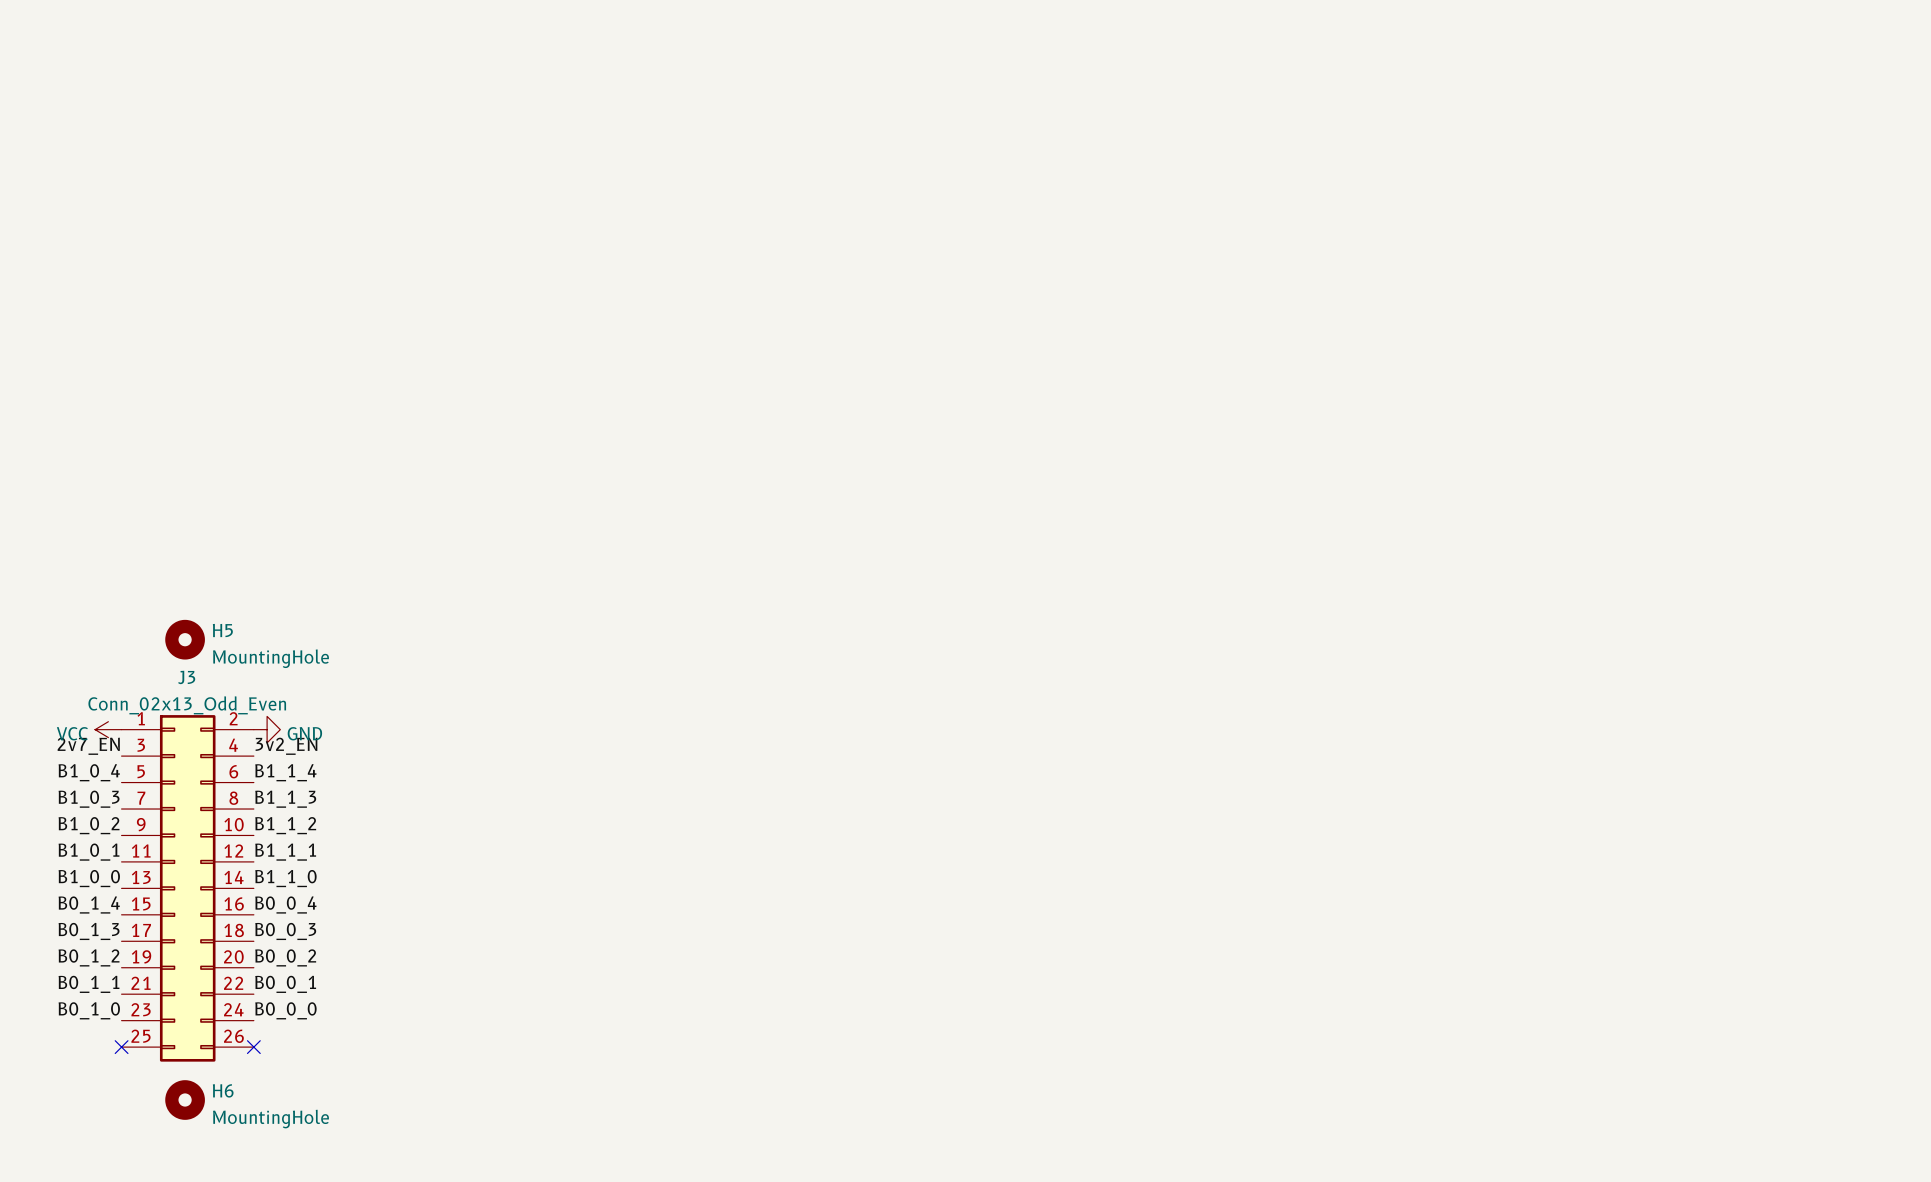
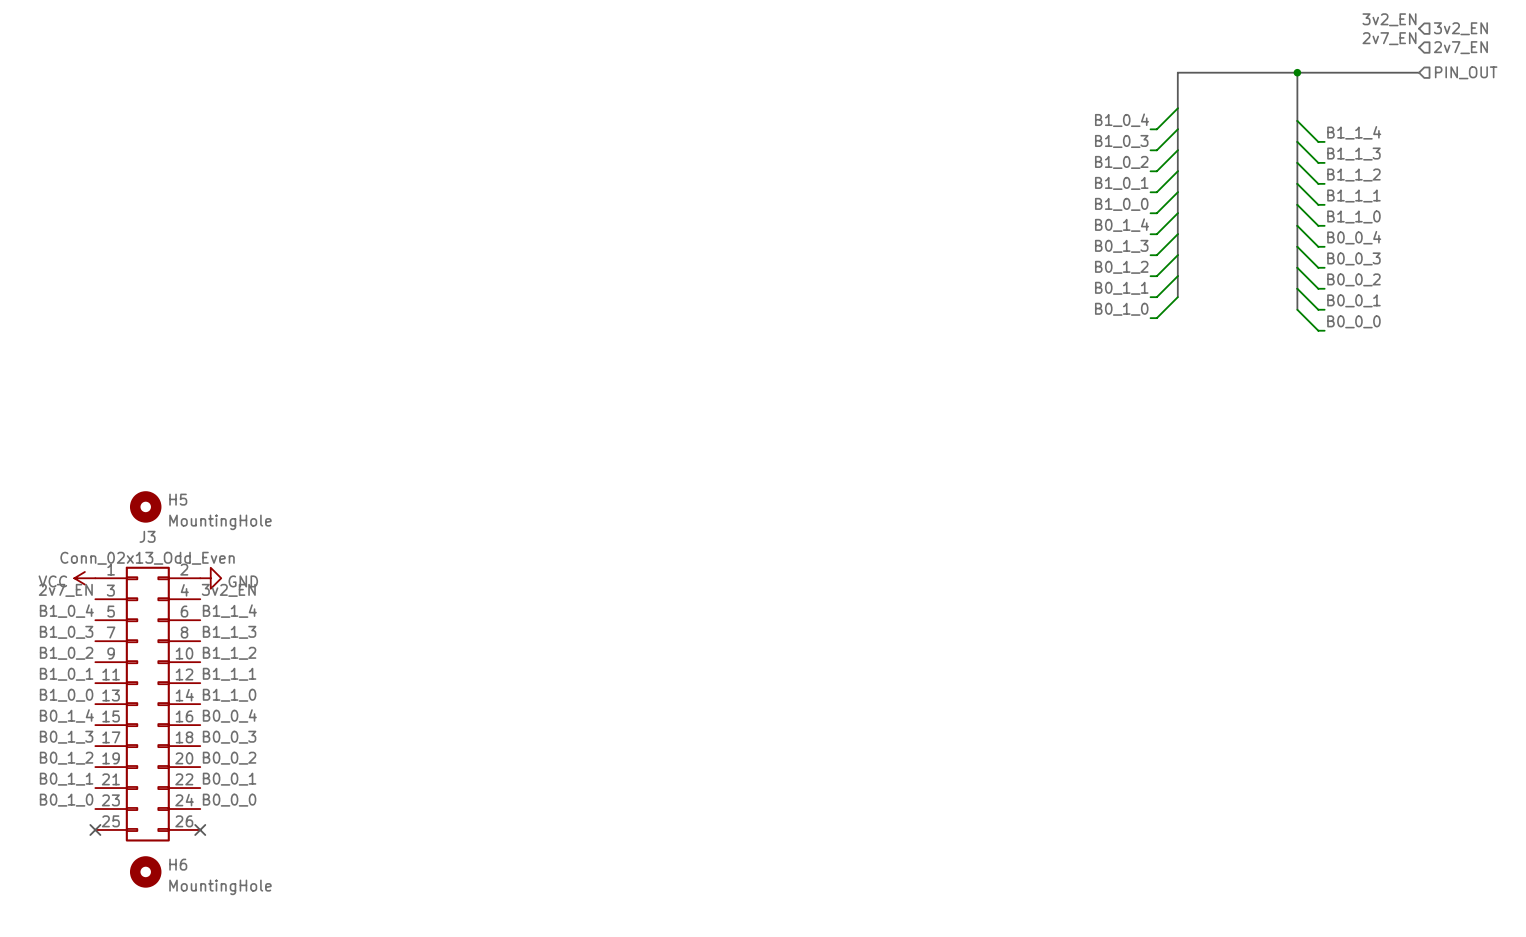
label: none -> 3v2_EN (1389, 19)
hierarchical label: none -> 3v2_EN (1460, 28)
label: none -> 2v7_EN (1389, 38)
hierarchical label: none -> 2v7_EN (1460, 47)
bus: none -> (1297, 72) (1297, 309)
junction: none -> (1297, 72)
bus: none -> (1419, 72) (1177, 72) (1177, 297)
hierarchical label: none -> PIN_OUT (1466, 72)
wire: none -> (1177, 108) (1156, 129) (1150, 129)
wire: none -> (1297, 120) (1318, 141) (1324, 141)
label: none -> B1_0_4 (1121, 120)
wire: none -> (1177, 129) (1156, 150) (1150, 150)
label: none -> B1_1_4 (1354, 132)
wire: none -> (1297, 141) (1318, 162) (1324, 162)
label: none -> B1_0_3 (1121, 141)
wire: none -> (1177, 150) (1156, 171) (1150, 171)
label: none -> B1_1_3 (1353, 154)
wire: none -> (1297, 162) (1318, 183) (1324, 183)
label: none -> B1_0_2 (1121, 162)
wire: none -> (1177, 171) (1156, 192) (1150, 192)
label: none -> B1_1_2 (1353, 175)
wire: none -> (1297, 183) (1318, 204) (1324, 204)
label: none -> B1_0_1 (1121, 183)
wire: none -> (1177, 192) (1156, 213) (1150, 213)
label: none -> B1_1_1 (1353, 196)
wire: none -> (1297, 204) (1318, 225) (1324, 225)
label: none -> B1_0_0 (1121, 204)
wire: none -> (1177, 213) (1156, 234) (1150, 234)
label: none -> B1_1_0 (1353, 216)
label: none -> B0_1_4 (1121, 225)
wire: none -> (1297, 225) (1318, 246) (1324, 246)
wire: none -> (1177, 234) (1156, 255) (1150, 255)
label: none -> B0_0_4 (1354, 237)
wire: none -> (1297, 246) (1318, 267) (1324, 267)
label: none -> B0_1_3 (1121, 246)
wire: none -> (1177, 255) (1156, 276) (1150, 276)
label: none -> B0_0_3 (1353, 258)
label: none -> B0_1_2 (1121, 267)
wire: none -> (1297, 267) (1318, 288) (1324, 288)
wire: none -> (1177, 276) (1156, 297) (1150, 297)
label: none -> B0_0_2 (1353, 279)
wire: none -> (1297, 288) (1318, 309) (1324, 309)
label: none -> B0_1_1 (1121, 288)
wire: none -> (1177, 297) (1156, 318) (1150, 318)
label: none -> B0_0_1 (1353, 300)
label: none -> B0_1_0 (1121, 309)
wire: none -> (1297, 309) (1318, 330) (1324, 330)
label: none -> B0_0_0 (1353, 321)

